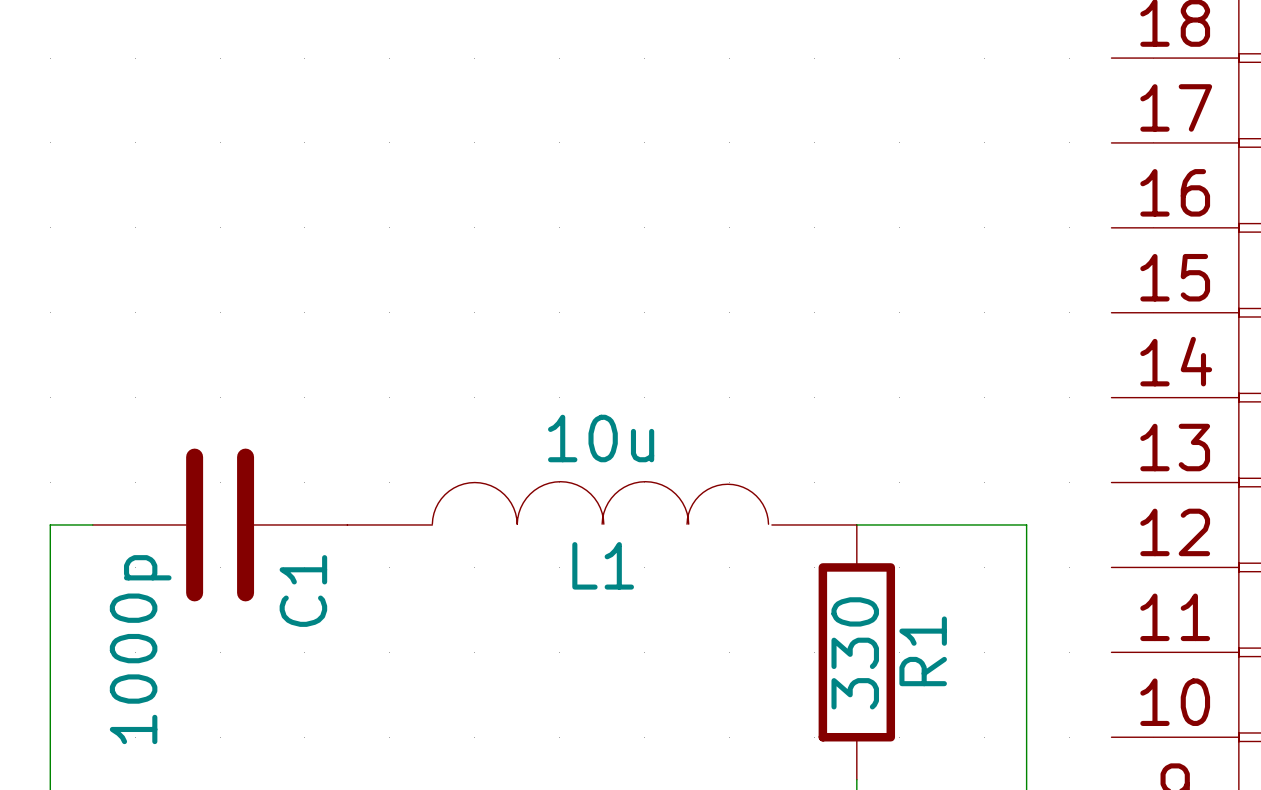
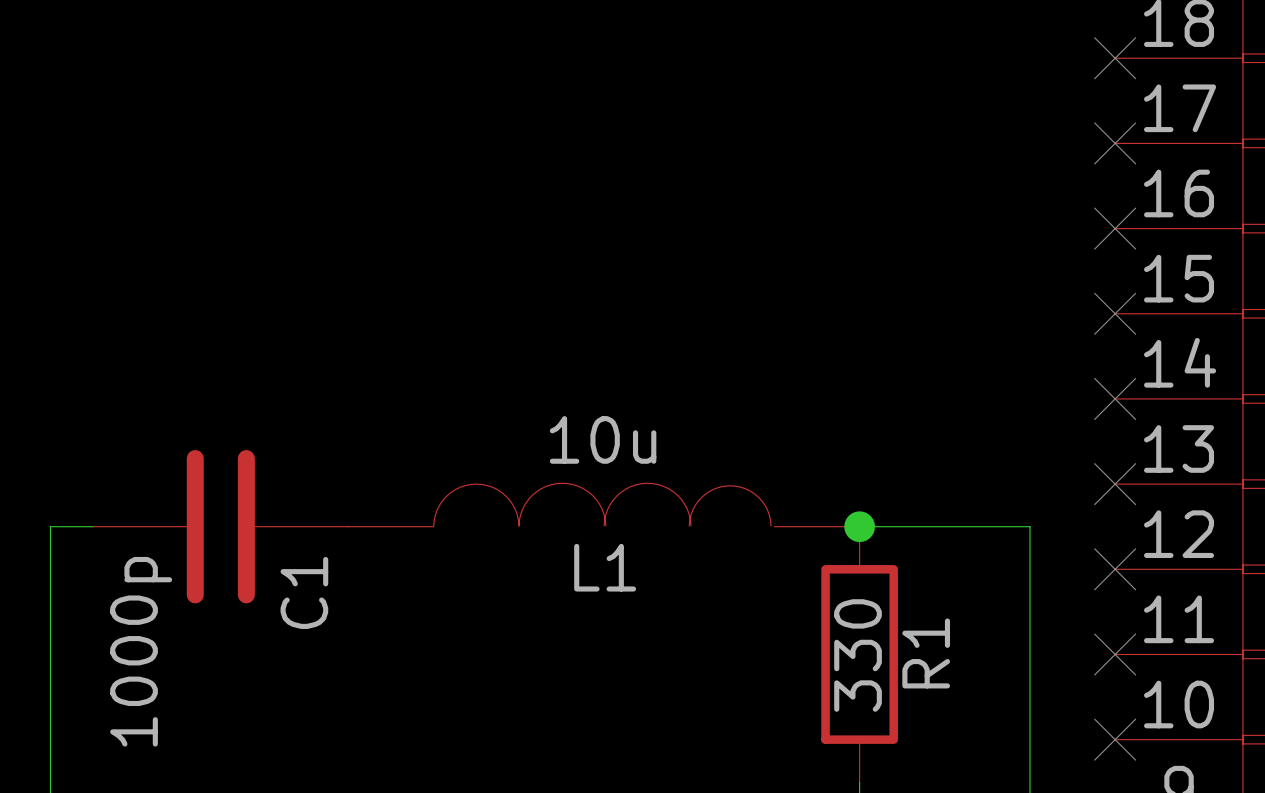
no-connect mark: none -> (1115, 58)
no-connect mark: none -> (1115, 143)
no-connect mark: none -> (1115, 228)
no-connect mark: none -> (1115, 313)
no-connect mark: none -> (1115, 398)
no-connect mark: none -> (1115, 484)
junction: none -> (859, 526)
no-connect mark: none -> (1115, 569)
no-connect mark: none -> (1115, 654)
no-connect mark: none -> (1115, 739)

